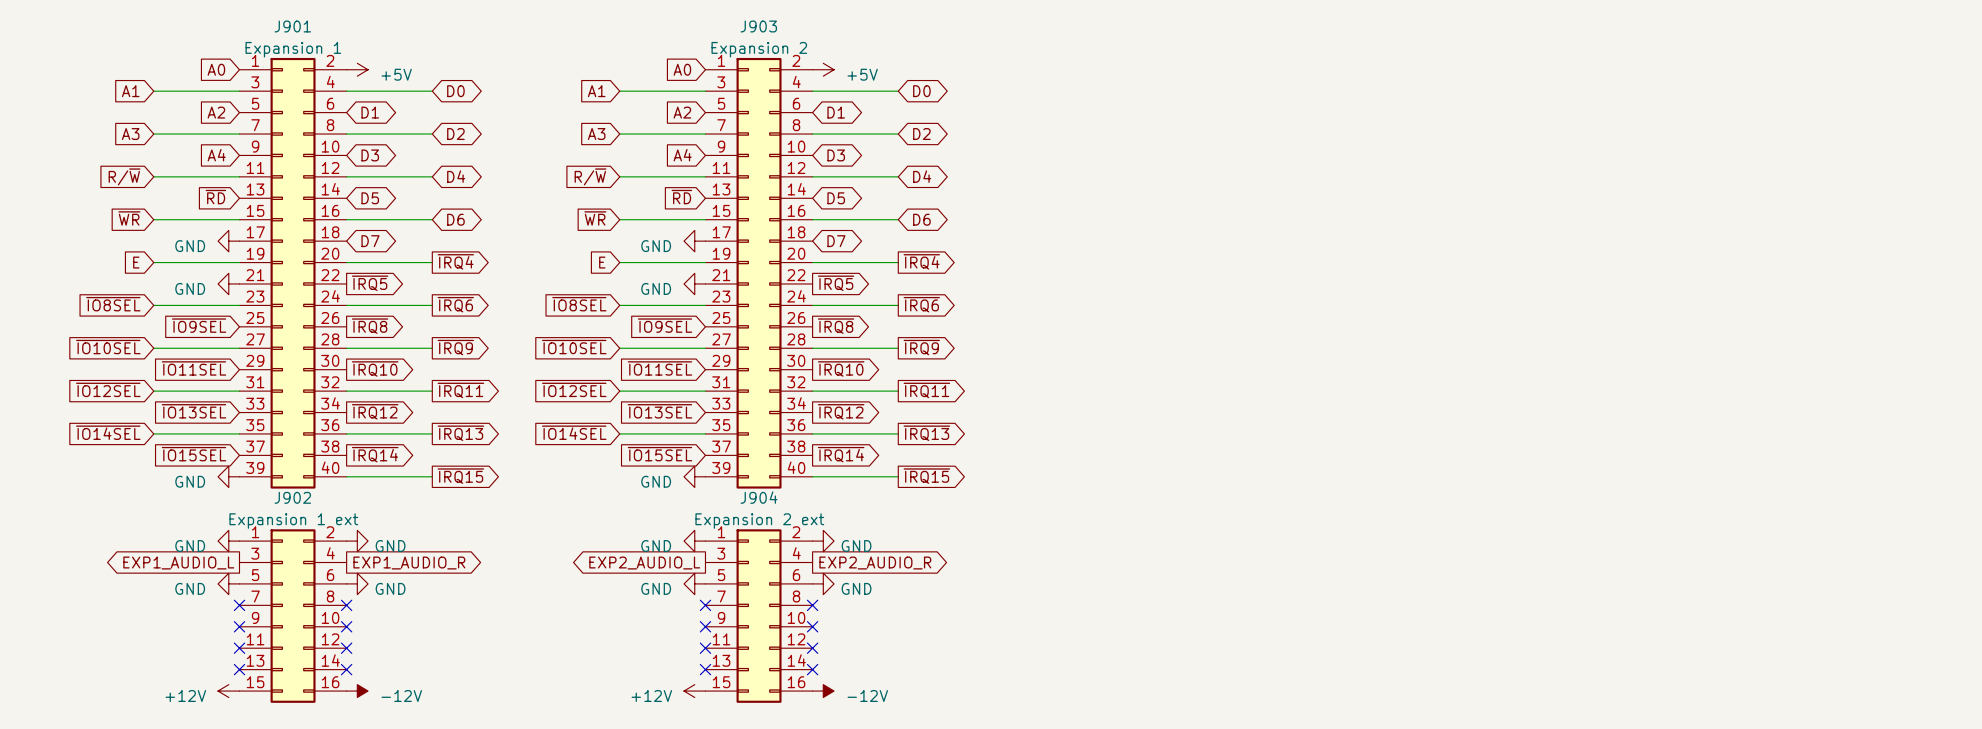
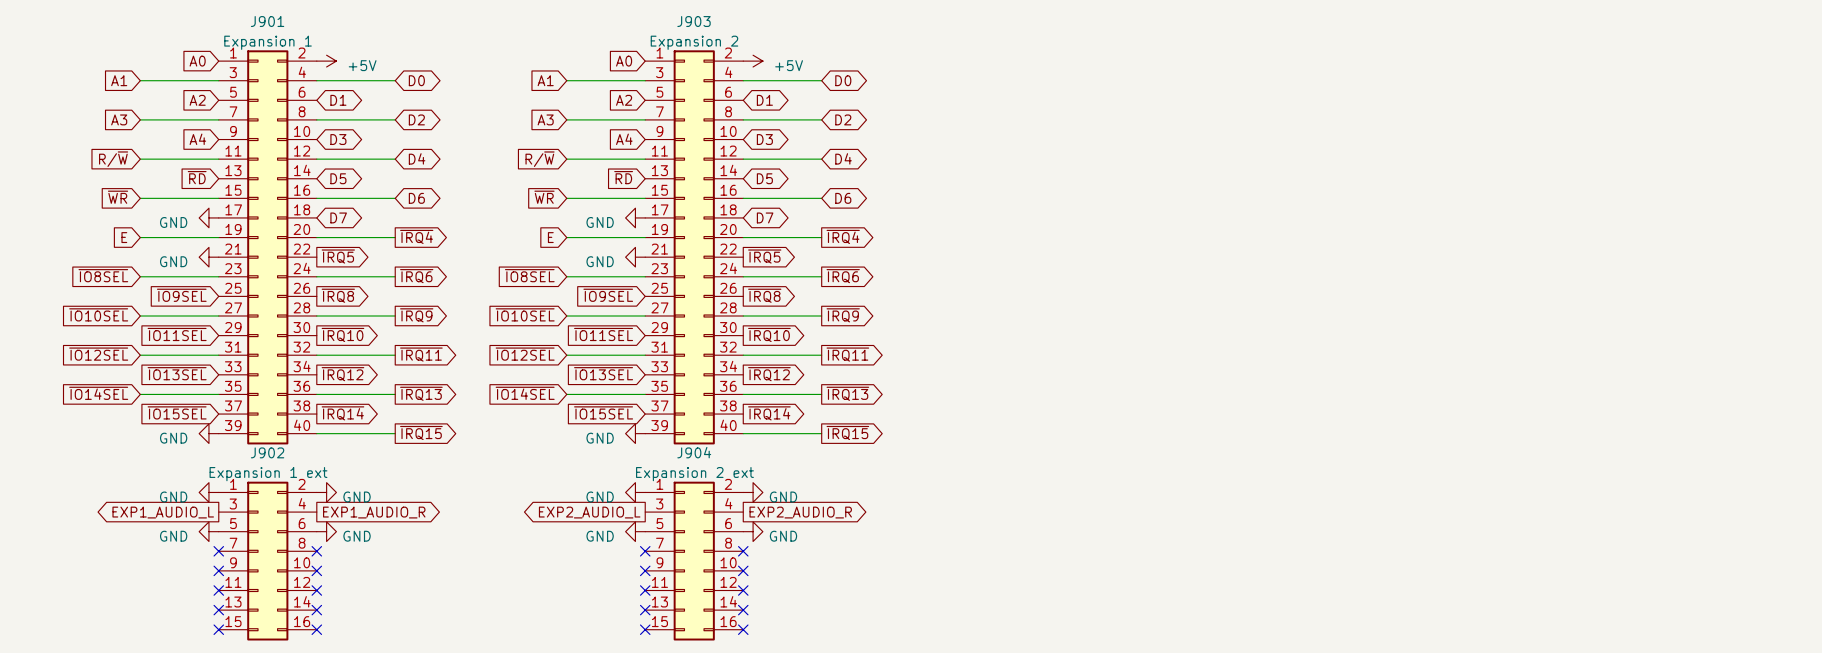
power symbol: +12V (228, 691) -> none
no-connect mark: none -> (218, 629)
no-connect mark: none -> (316, 629)
power symbol: -12V (357, 691) -> none
power symbol: +12V (694, 691) -> none
no-connect mark: none -> (645, 629)
no-connect mark: none -> (743, 629)
power symbol: -12V (823, 691) -> none

